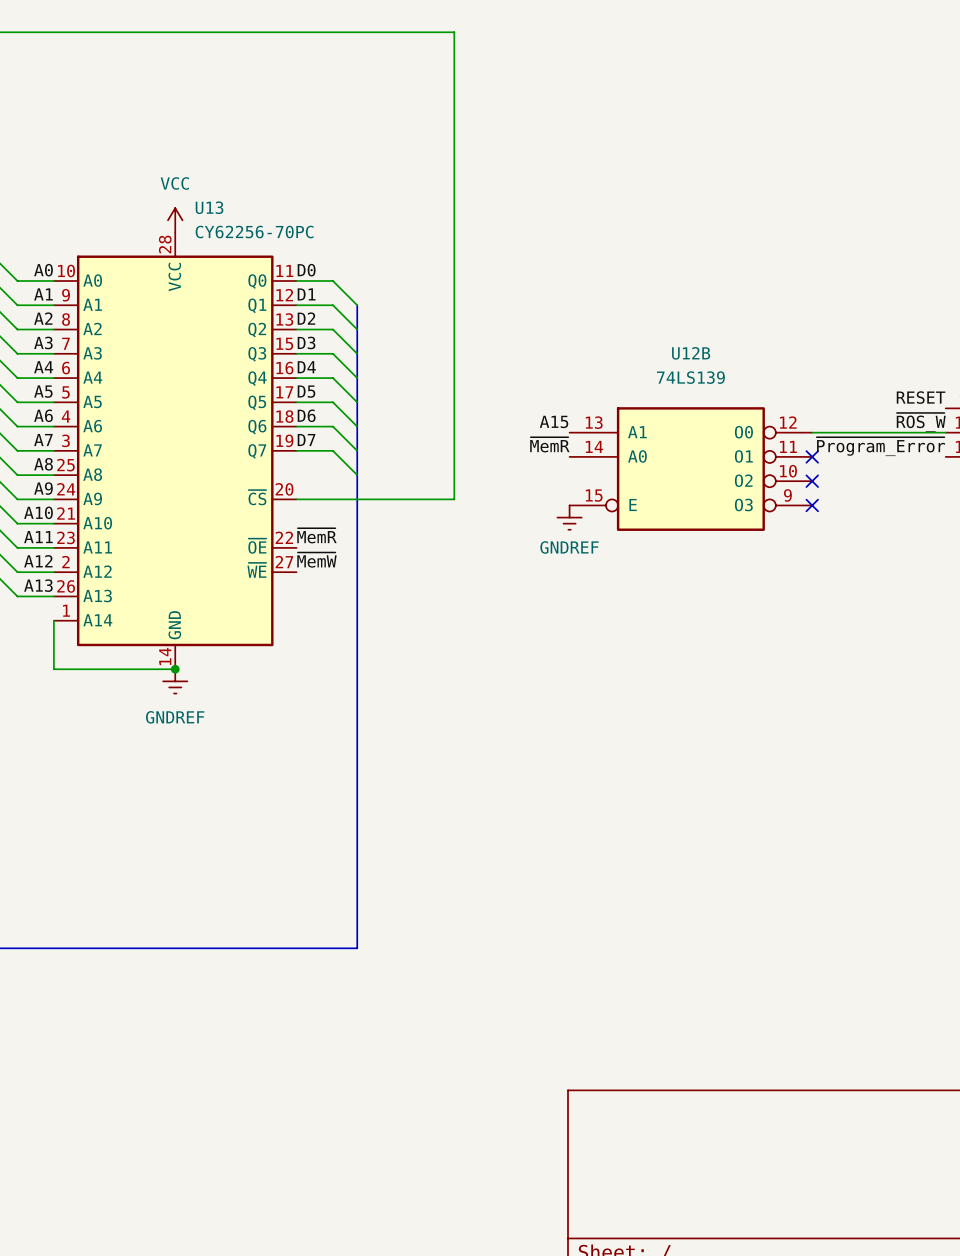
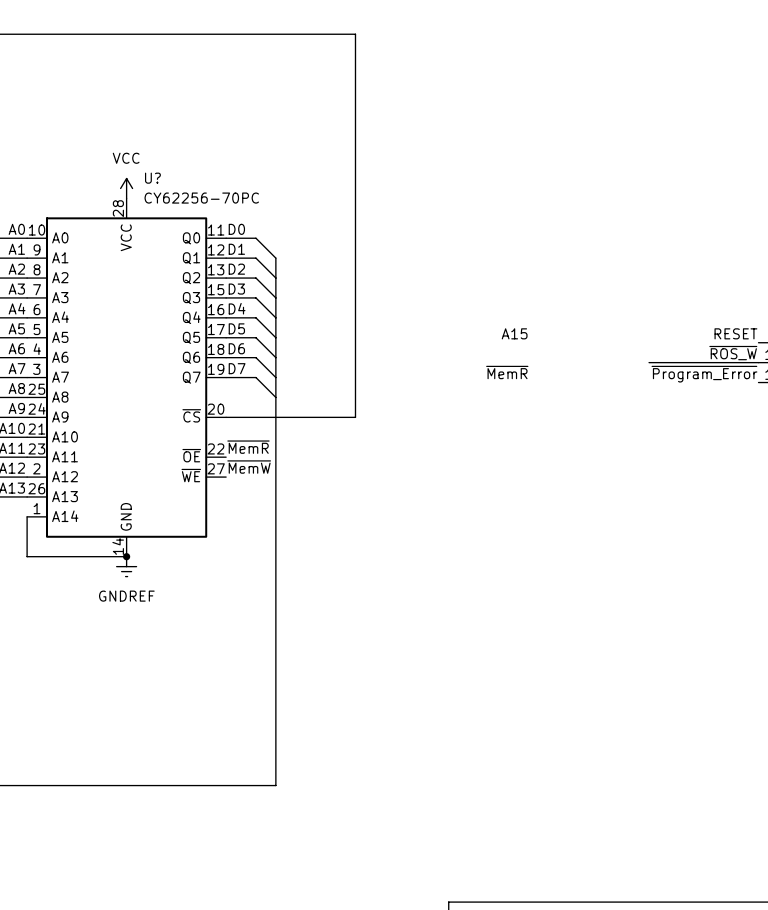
U13 name: U13 (209, 207) -> U? (152, 178)
label position: A15 (554, 421) -> A15 (514, 333)
label position: ~{MemR} (549, 444) -> ~{MemR} (507, 372)
no-connect mark: (812, 456) -> none
U12B: 74LS139 (690, 469) -> none
no-connect mark: (812, 481) -> none
no-connect mark: (812, 505) -> none
power symbol: GNDREF (569, 517) -> none

